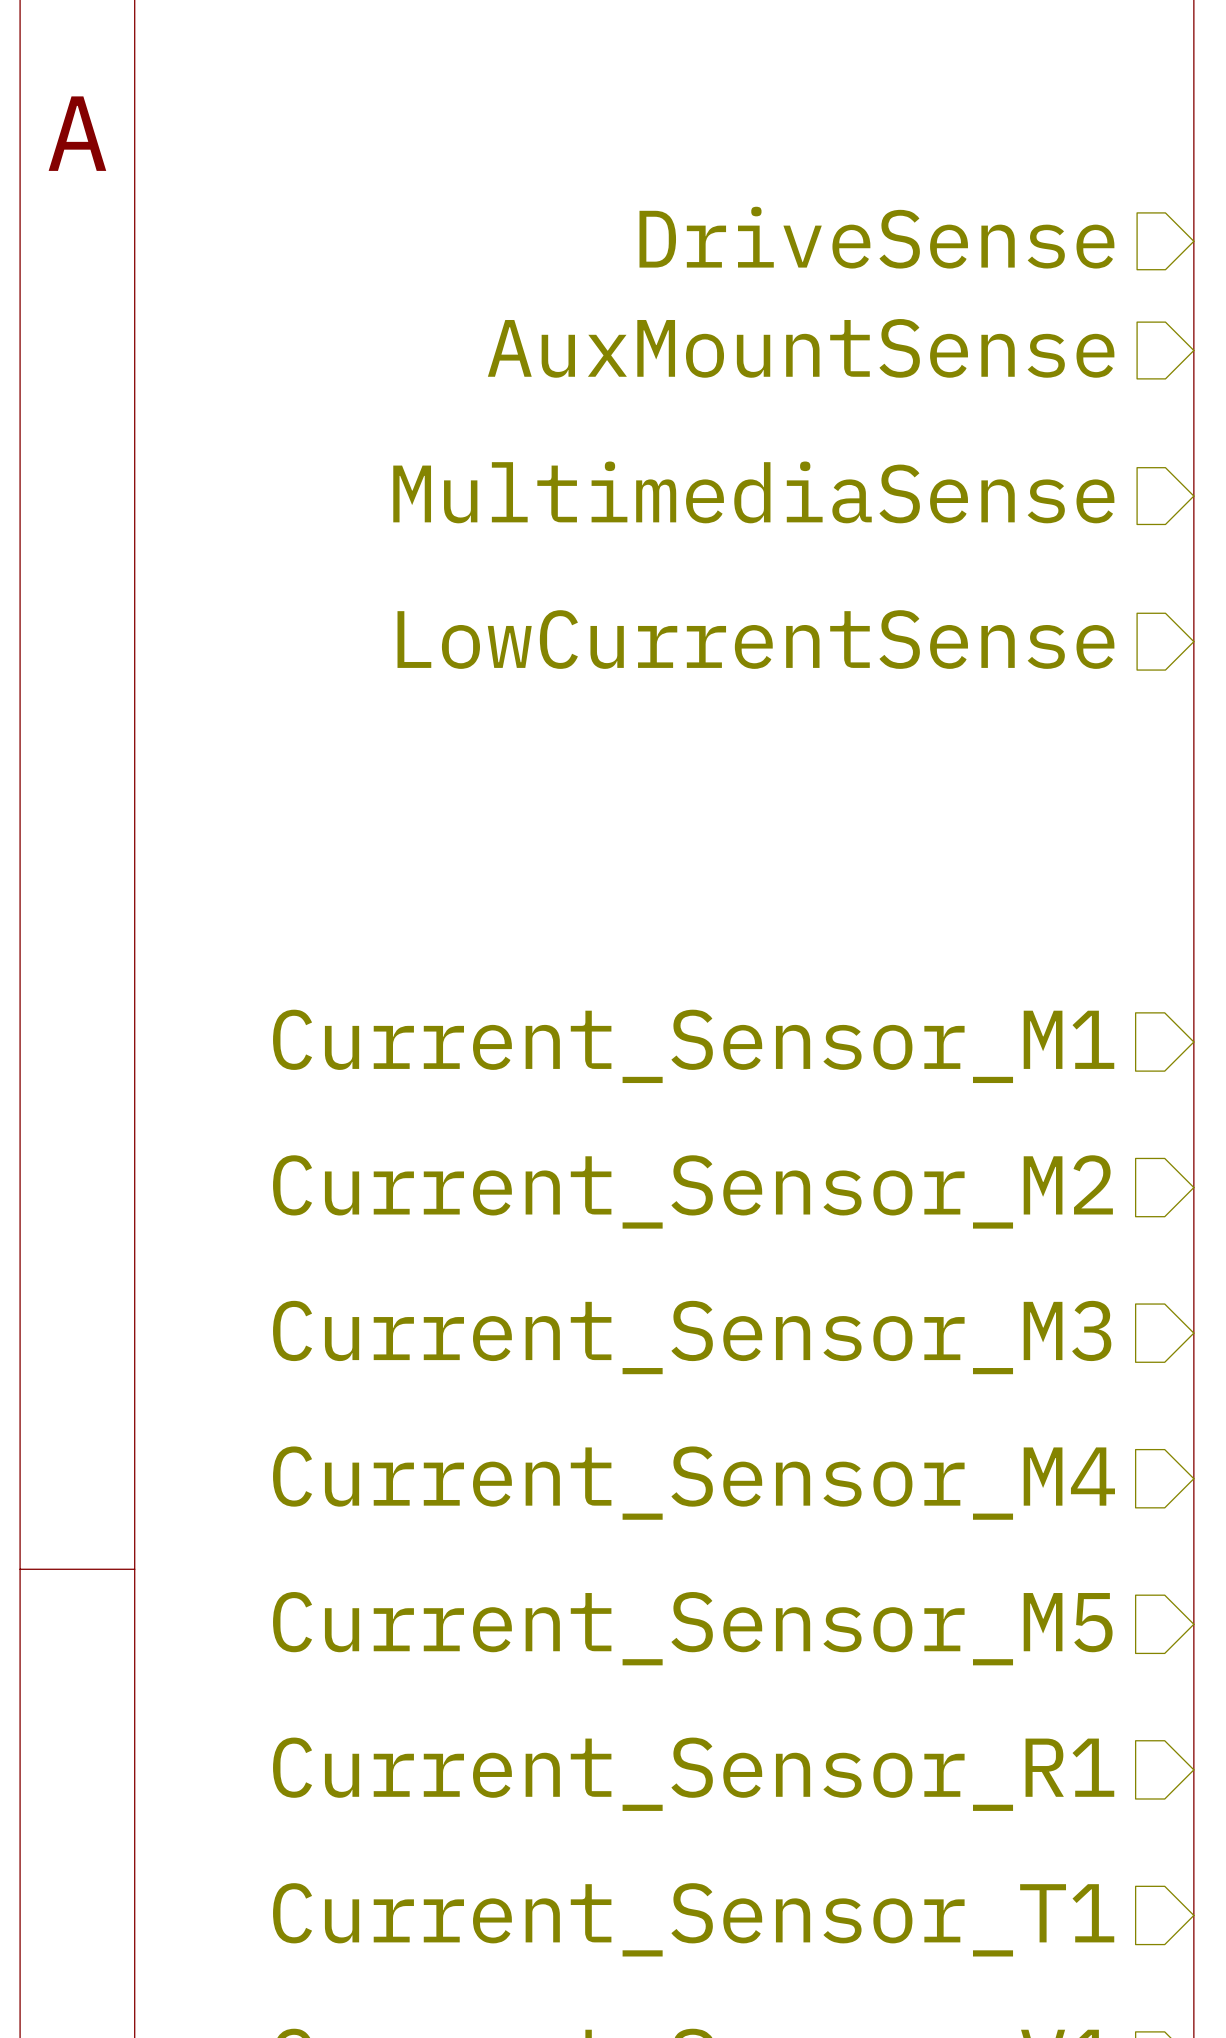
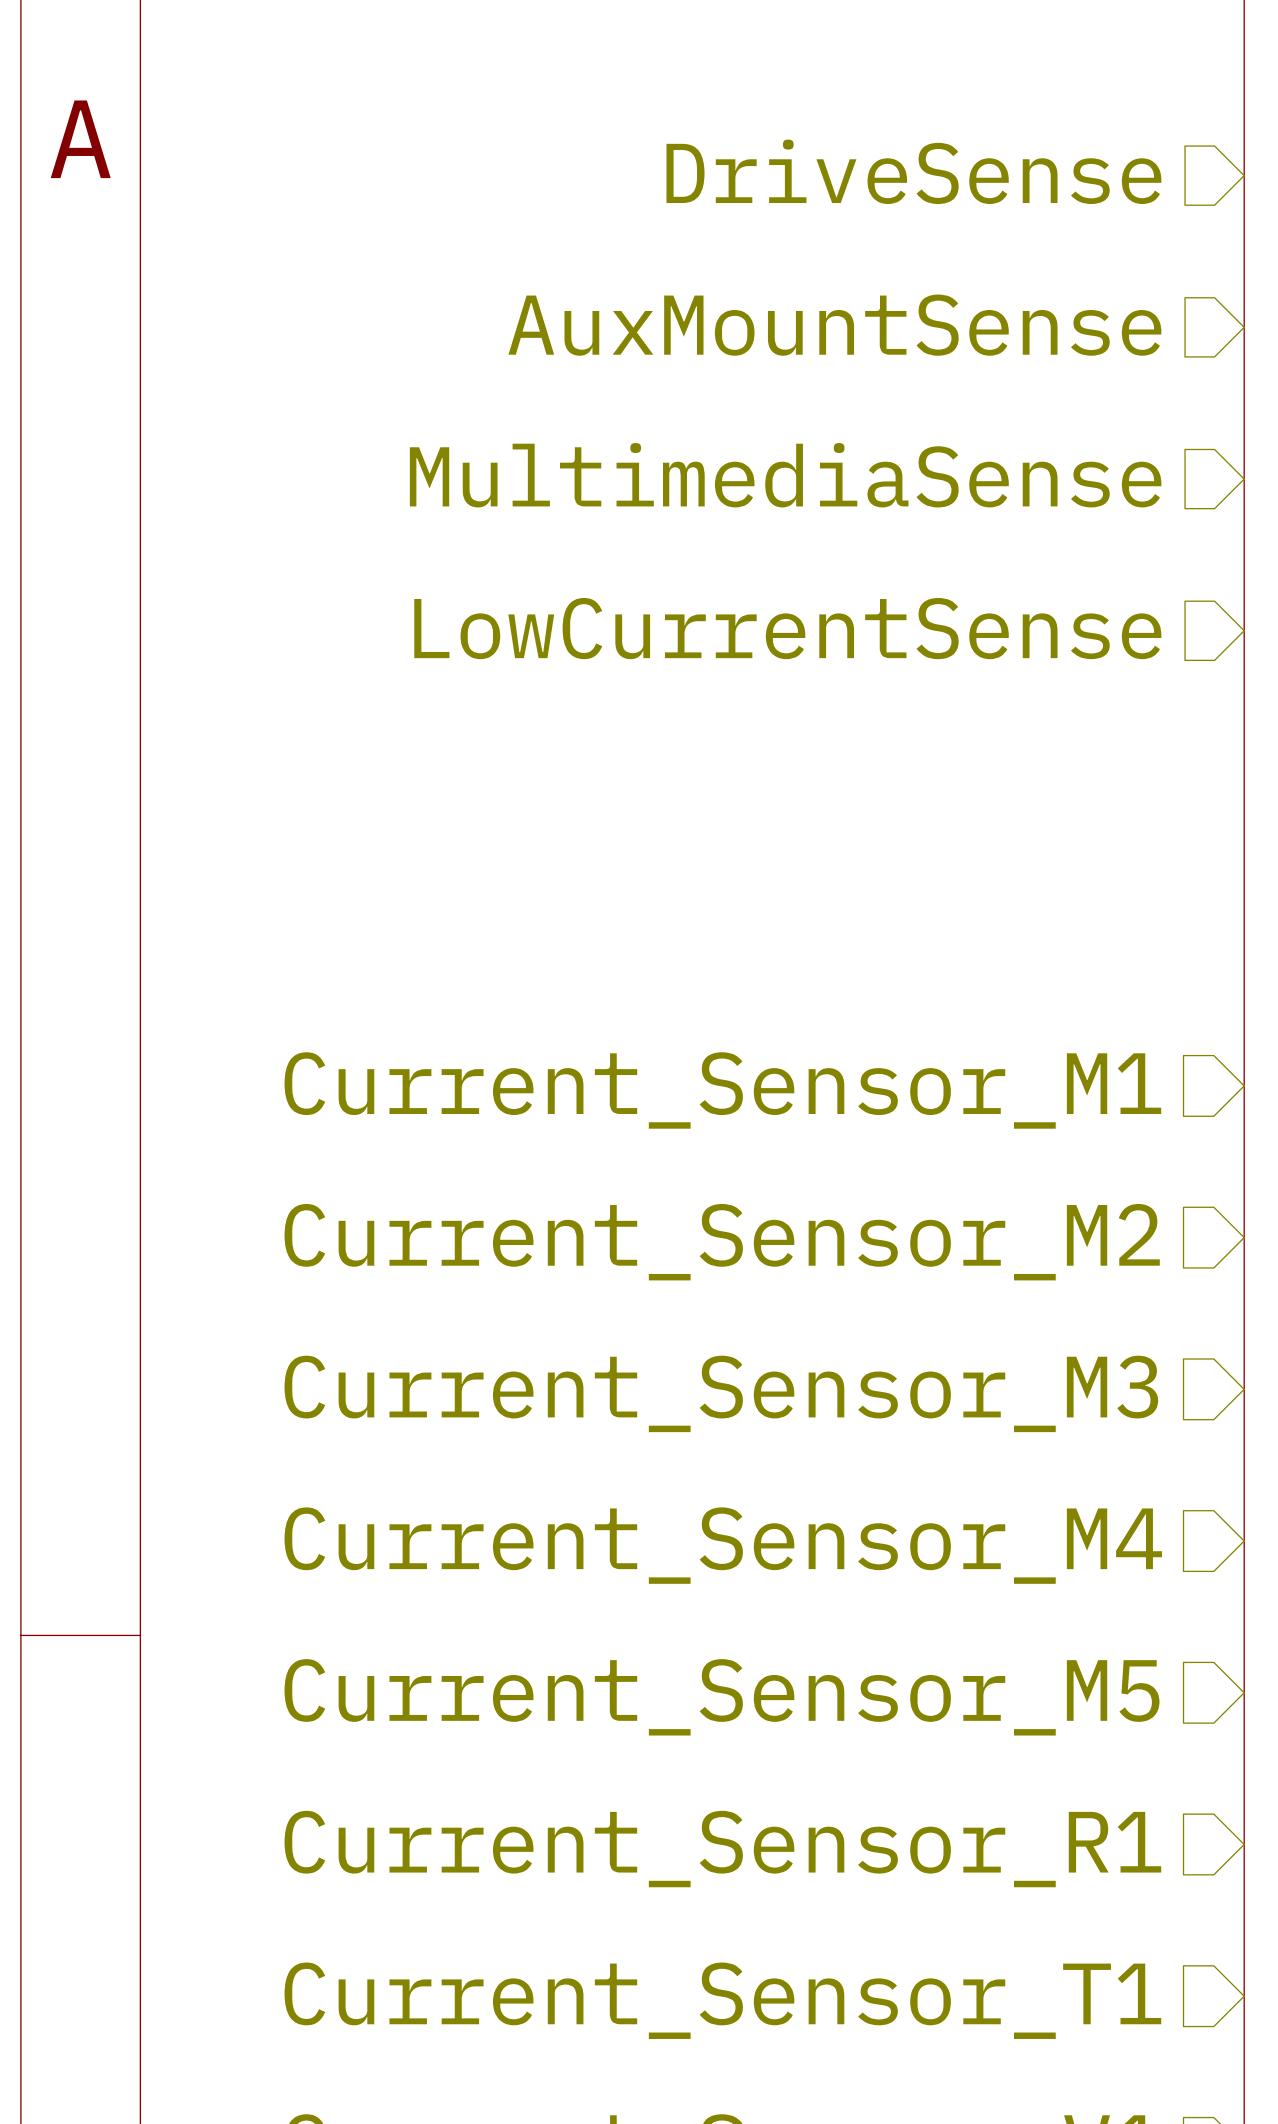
hierarchical label position: DriveSense (876, 237) -> DriveSense (913, 171)
hierarchical label position: AuxMountSense (801, 348) -> AuxMountSense (834, 325)
hierarchical label position: MultimediaSense (753, 492) -> MultimediaSense (785, 475)
hierarchical label position: LowCurrentSense (755, 639) -> LowCurrentSense (787, 628)

